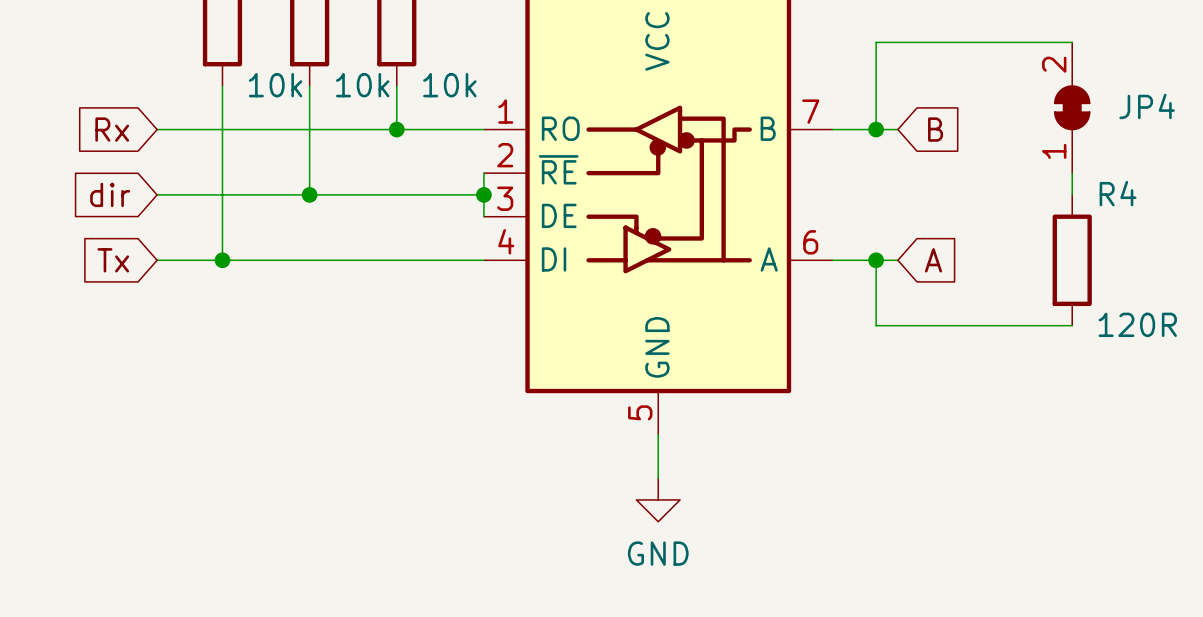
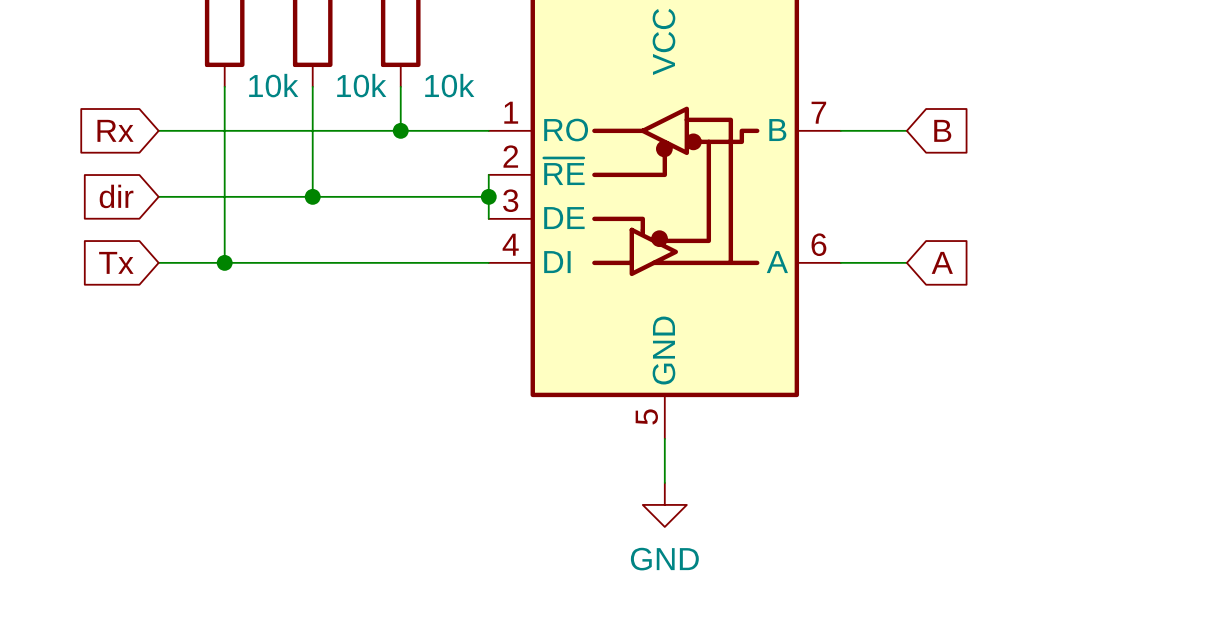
wire: (1072, 42) (876, 42) (876, 129) -> none
JP4: (1072, 107) -> none
junction: (876, 129) -> none
wire: (1072, 173) (1072, 194) -> none
wire: (876, 260) (876, 325) (1072, 325) -> none
junction: (876, 260) -> none
R4: 120R (1072, 260) -> none

